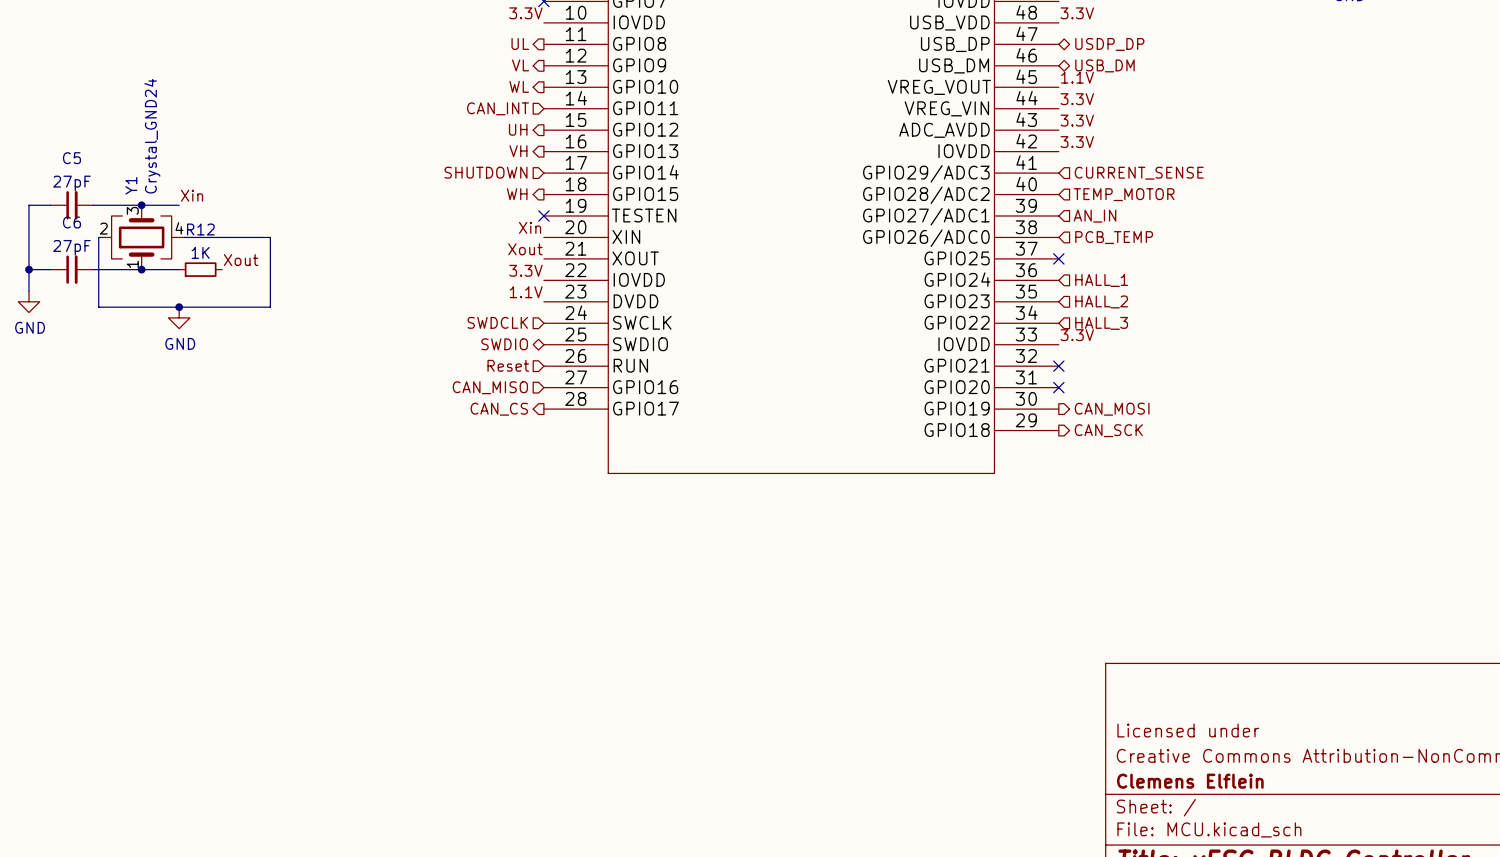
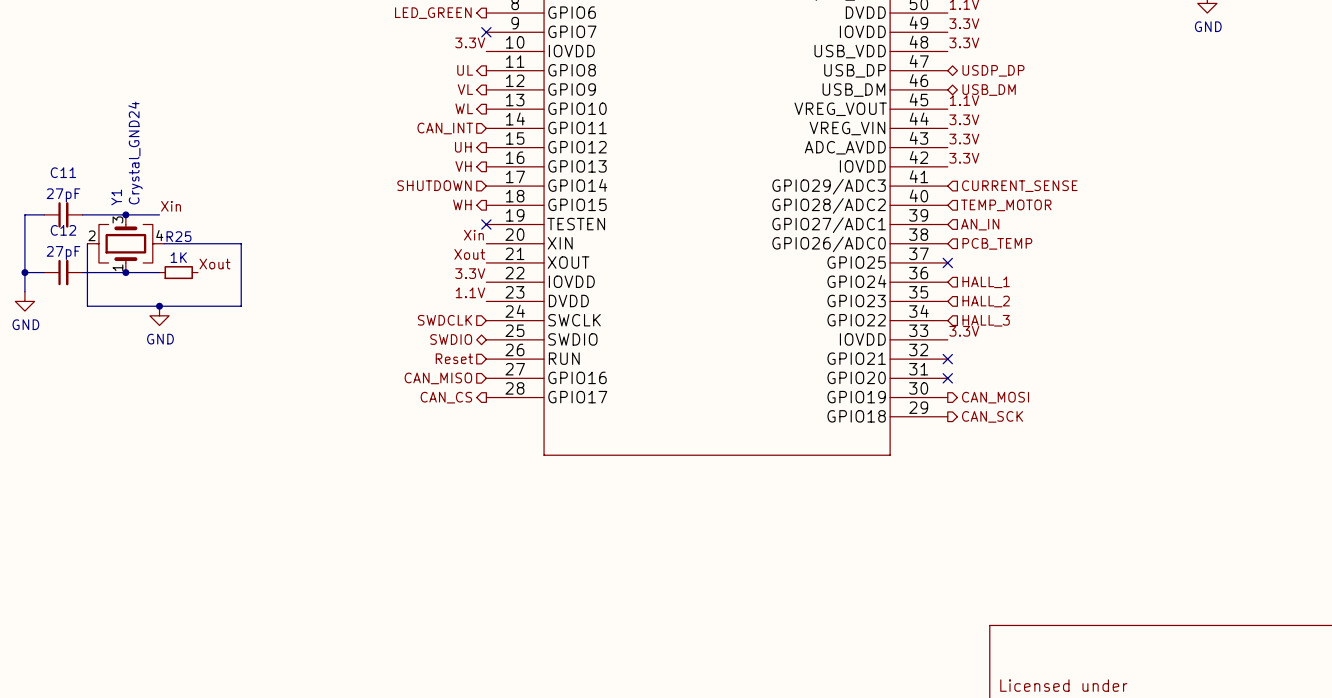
C5 name: C5 (71, 158) -> C11 (63, 172)
C6 name: C6 (71, 222) -> C12 (63, 230)
R12 name: R12 (200, 229) -> R25 (178, 236)

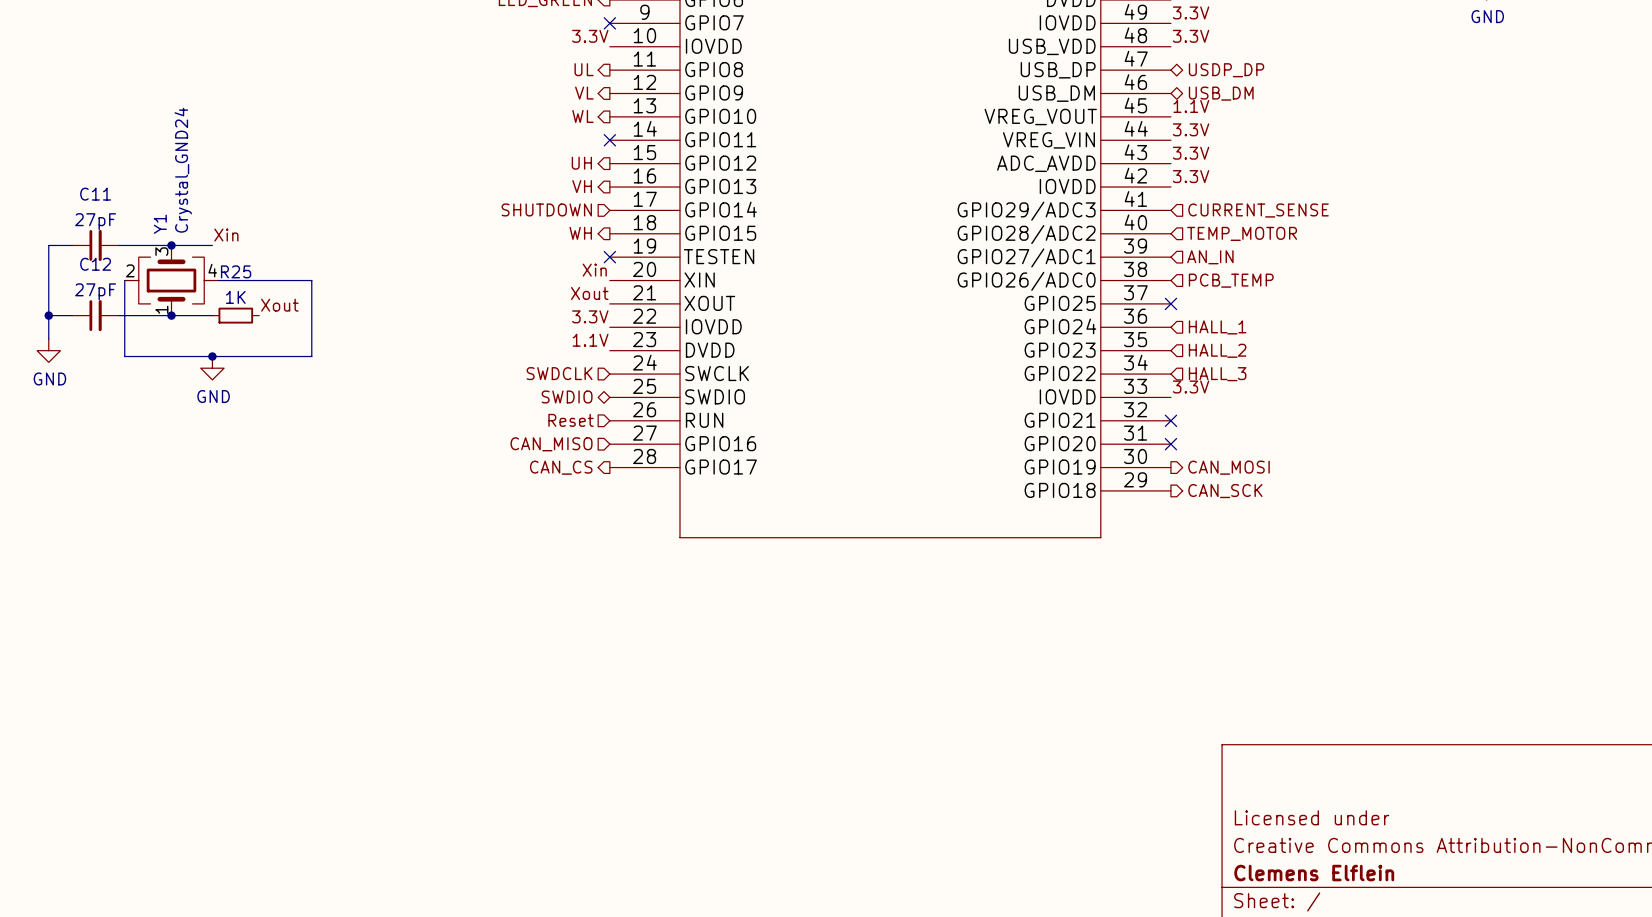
hierarchical label: CAN_INT (445, 128) -> none
no-connect mark: none -> (609, 140)

